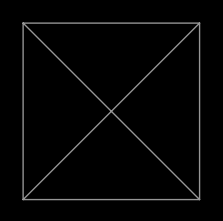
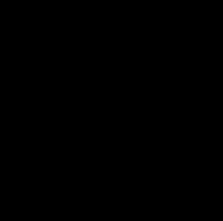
line: (23, 23) (199, 23) -> none
line: (23, 23) (199, 199) -> none
line: (23, 23) (23, 199) -> none
line: (199, 23) (23, 199) -> none
line: (199, 23) (199, 199) -> none
line: (23, 199) (199, 199) -> none

